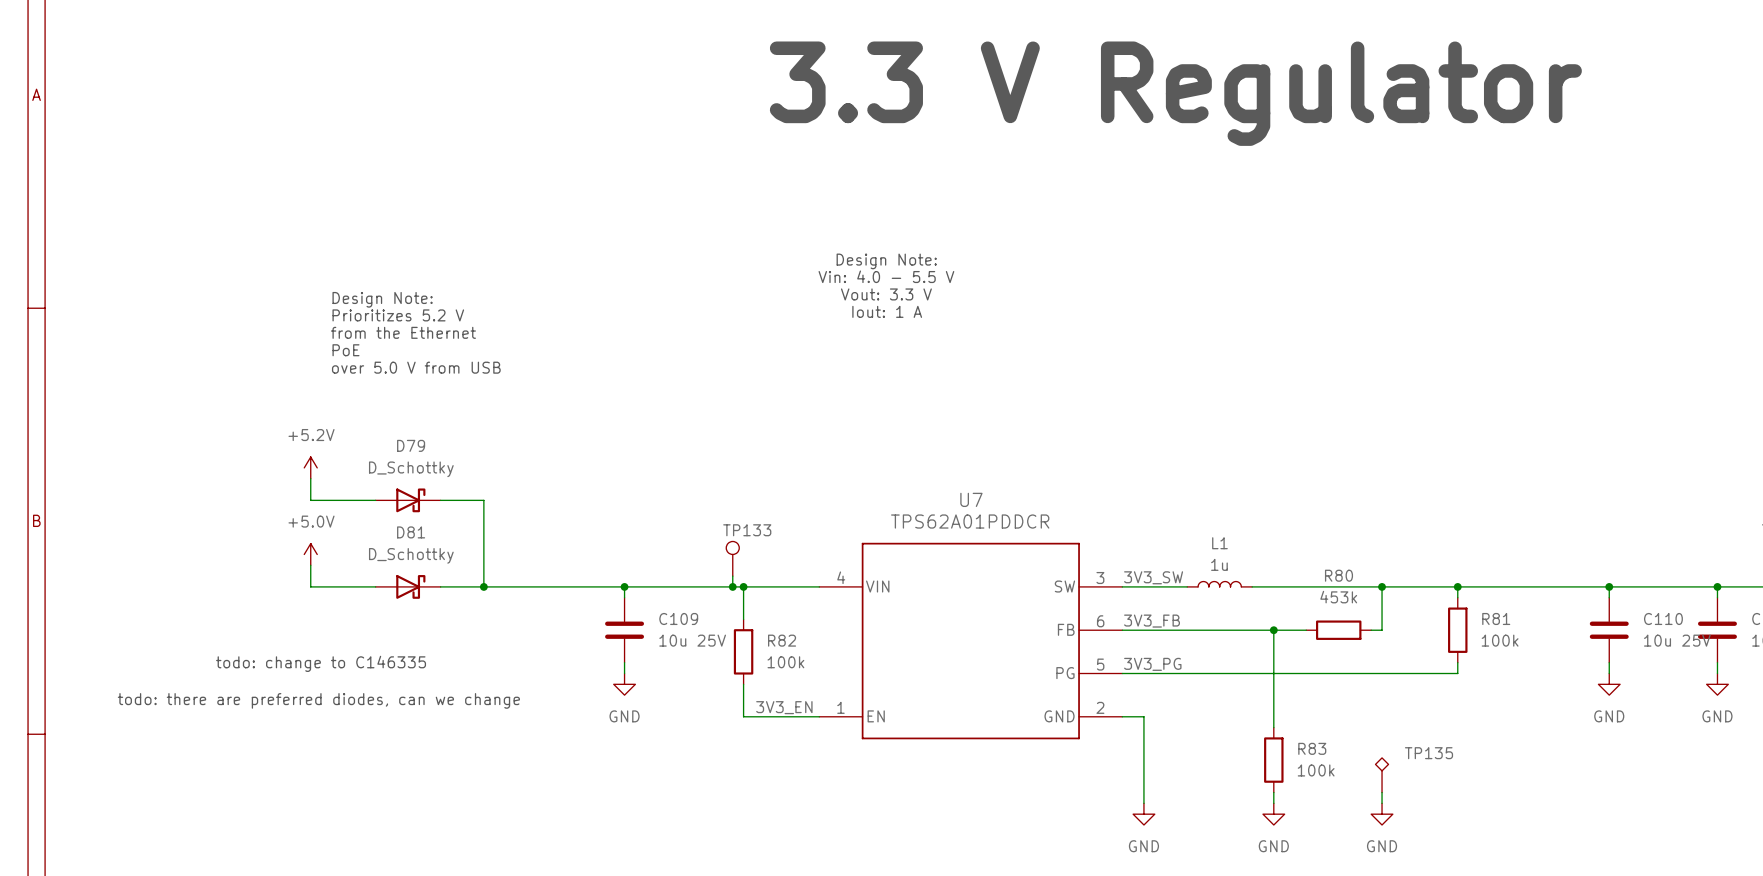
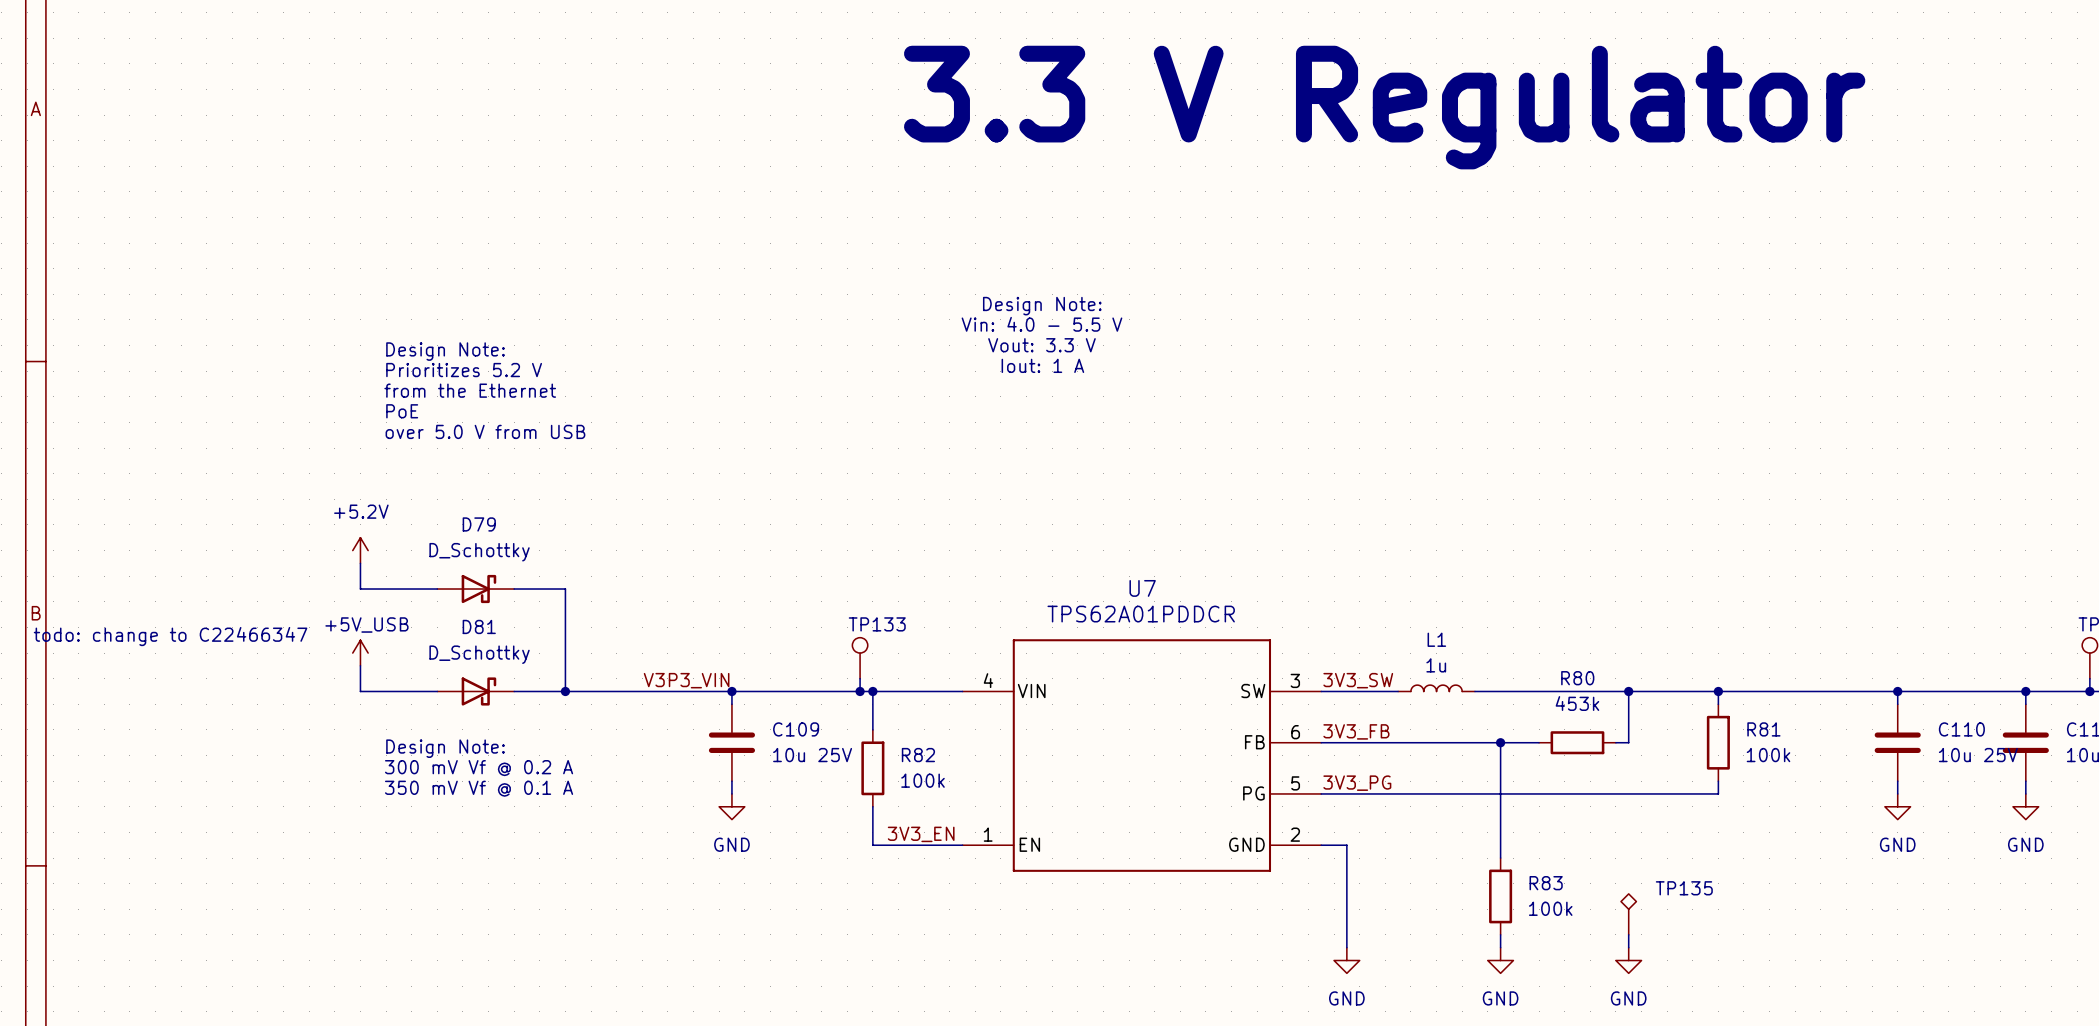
text: none -> todo: change to C22466347 (170, 636)
power symbol: +5.0V (310, 554) -> +5V_USB (360, 653)
label: none -> V3P3_VIN (686, 680)
text: none -> Design Note: (445, 748)
text: none -> 300 mV Vf @ 0.2 A (479, 768)
text: todo: change to C146335 (321, 663) -> 350 mV Vf @ 0.1 A (479, 788)
text: todo: there are preferred diodes, can we change (318, 700) -> none

